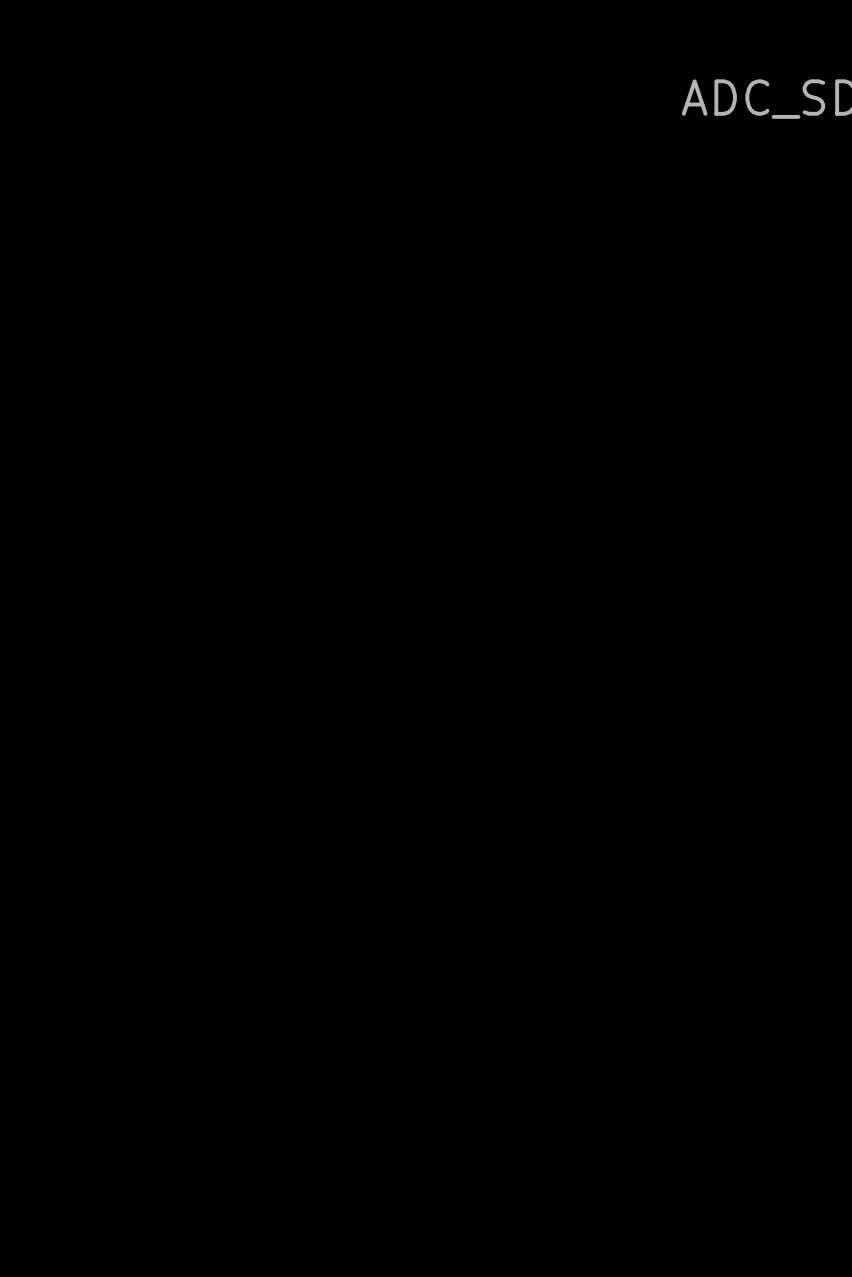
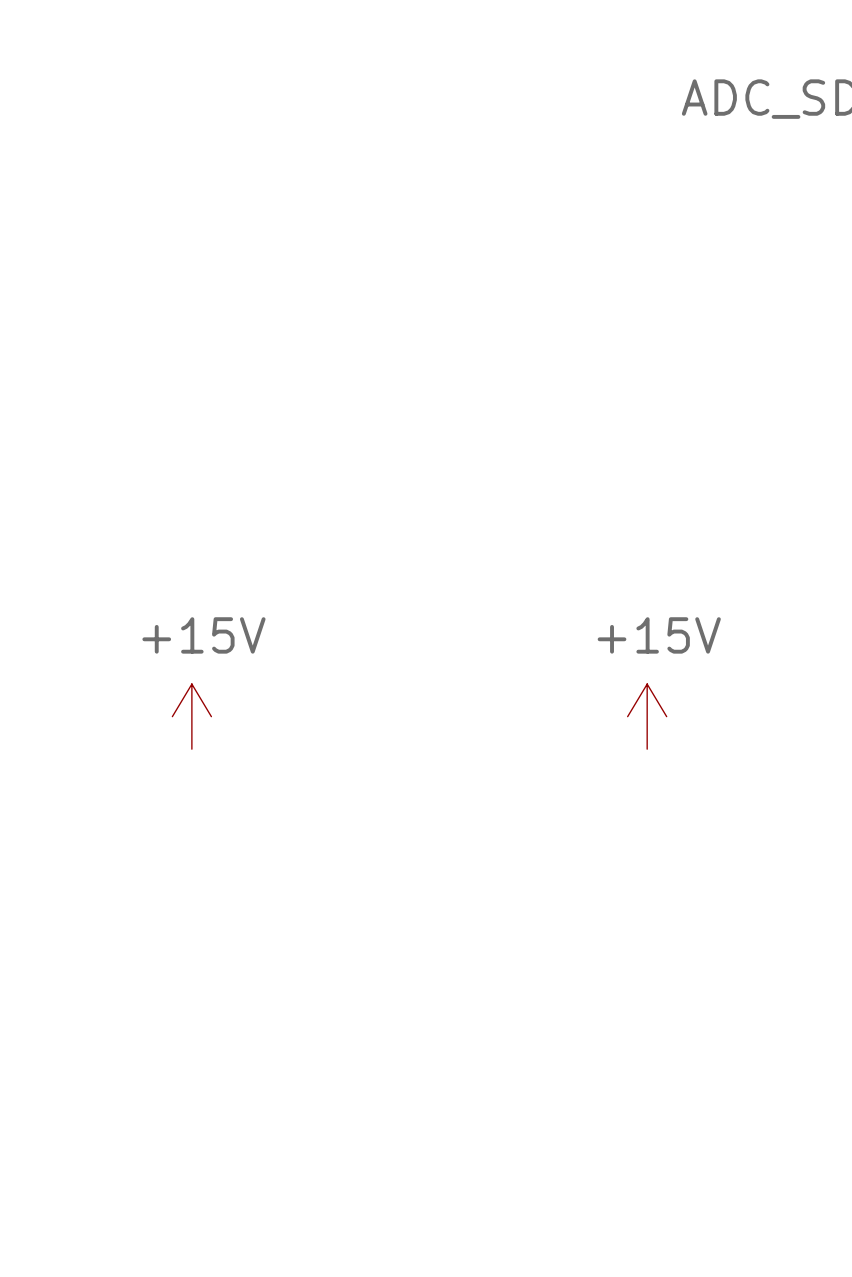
power symbol: none -> +15V (191, 716)
power symbol: none -> +15V (647, 716)

